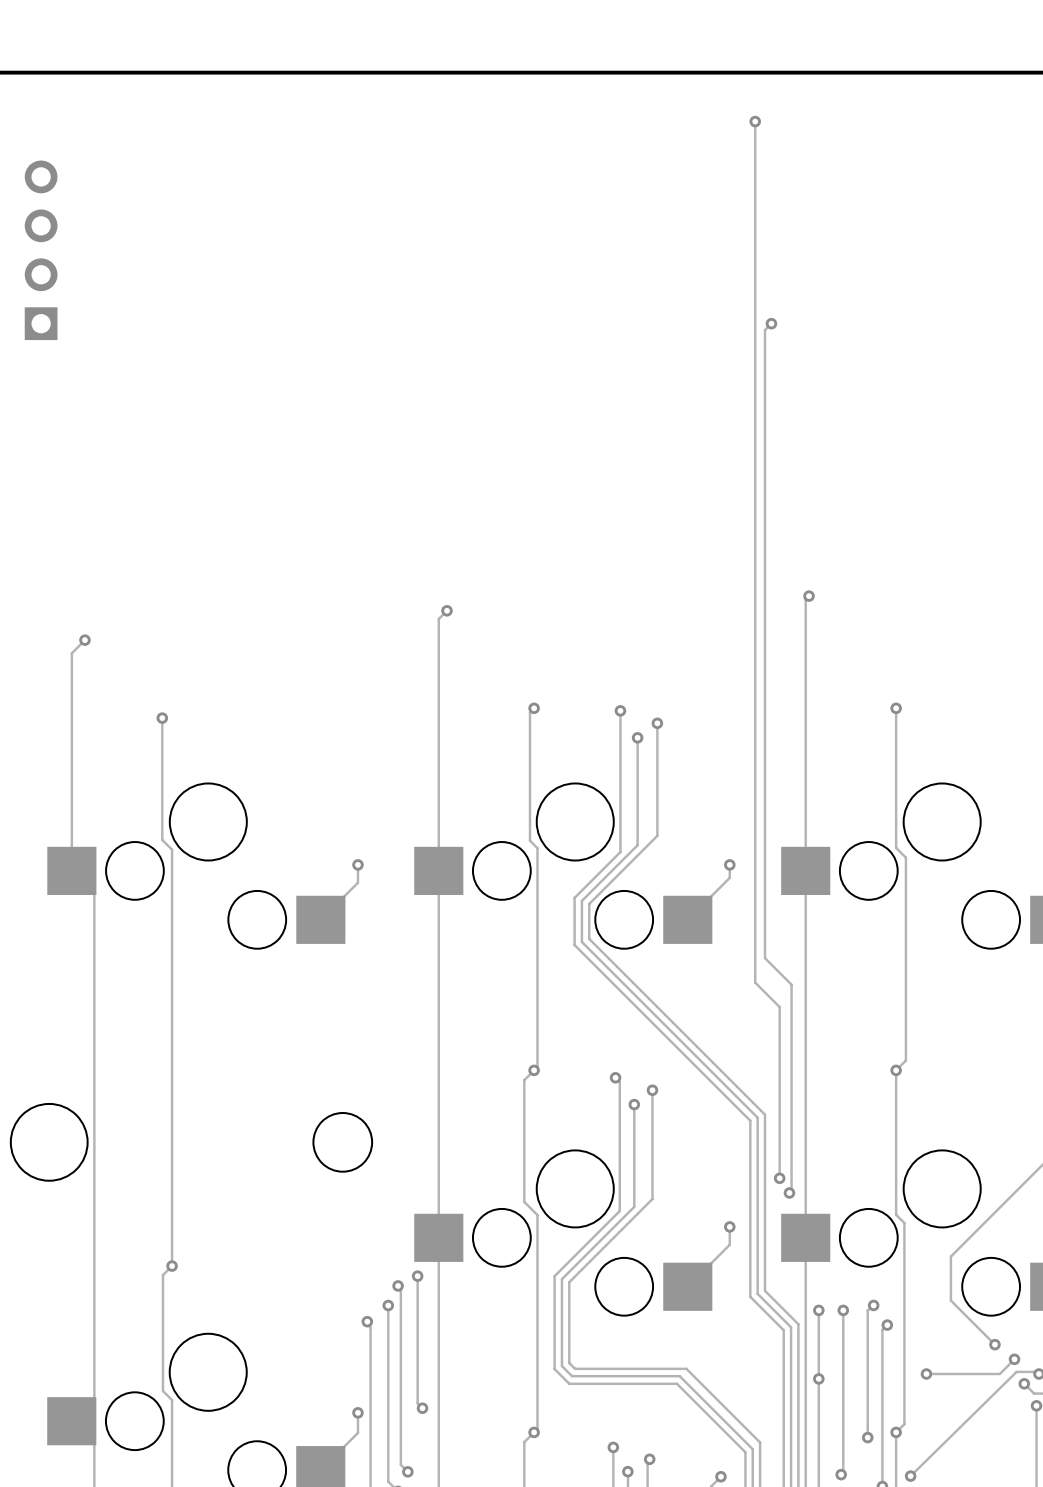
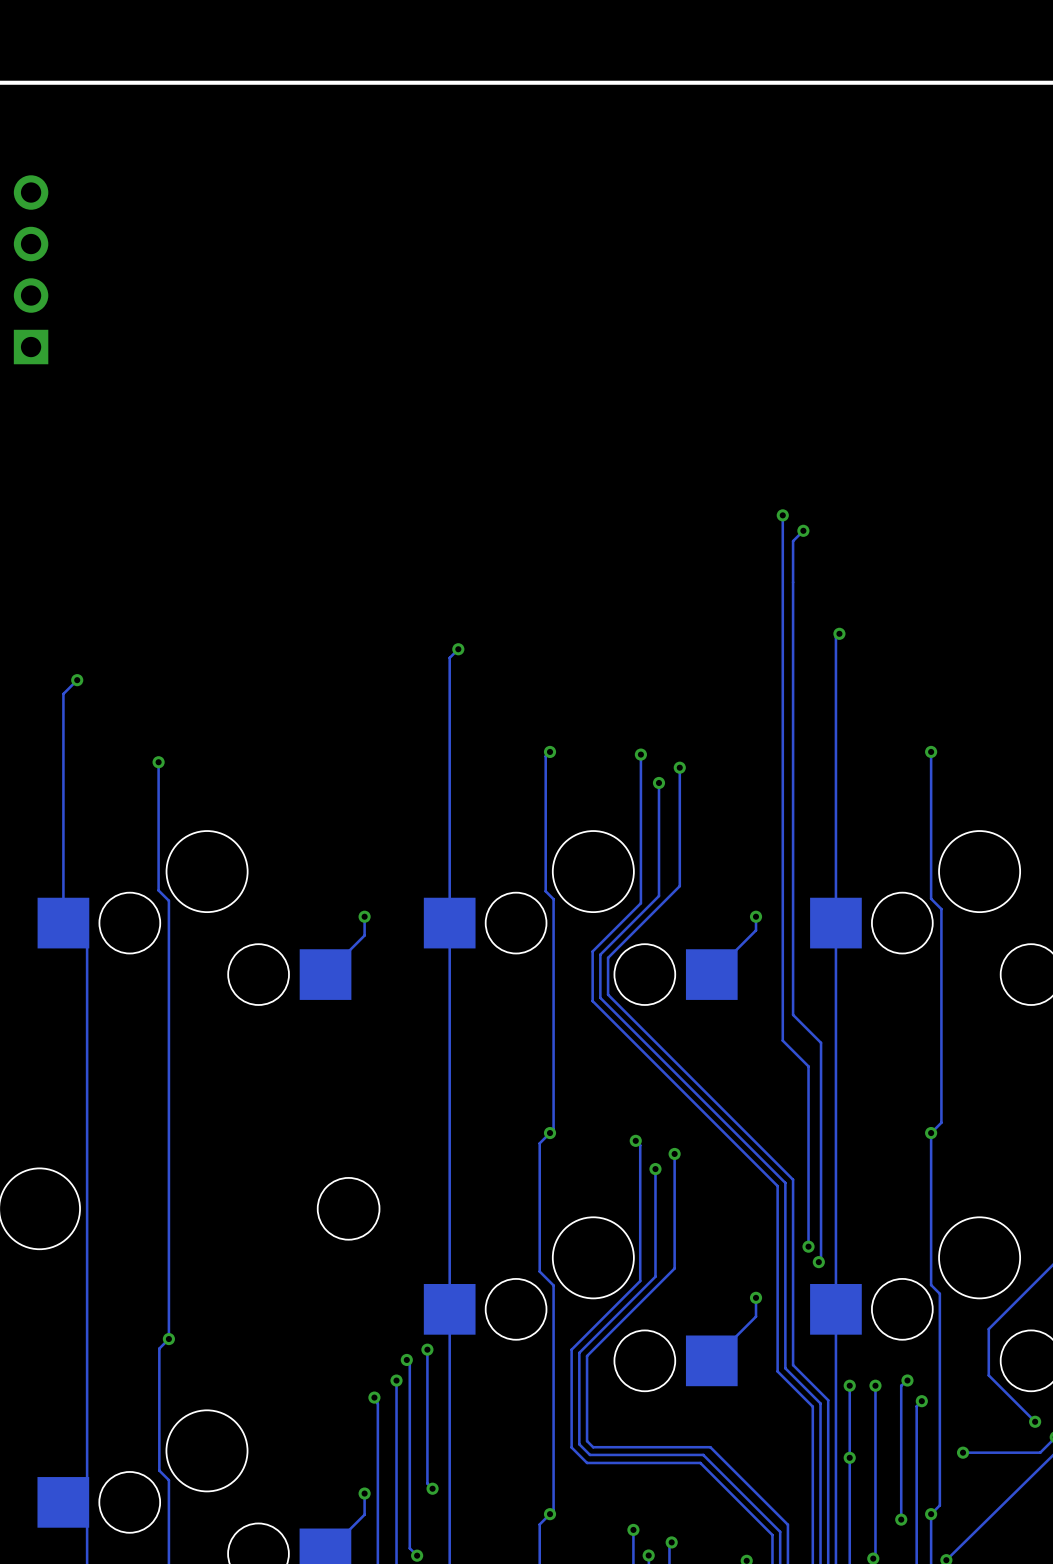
track: (755, 121) (755, 483) -> none
via: (755, 121) -> none
track: (771, 323) (765, 330) (765, 508) -> (803, 530) (793, 541)
via: (771, 323) -> none
via: none -> (782, 515)
via: none -> (803, 530)

